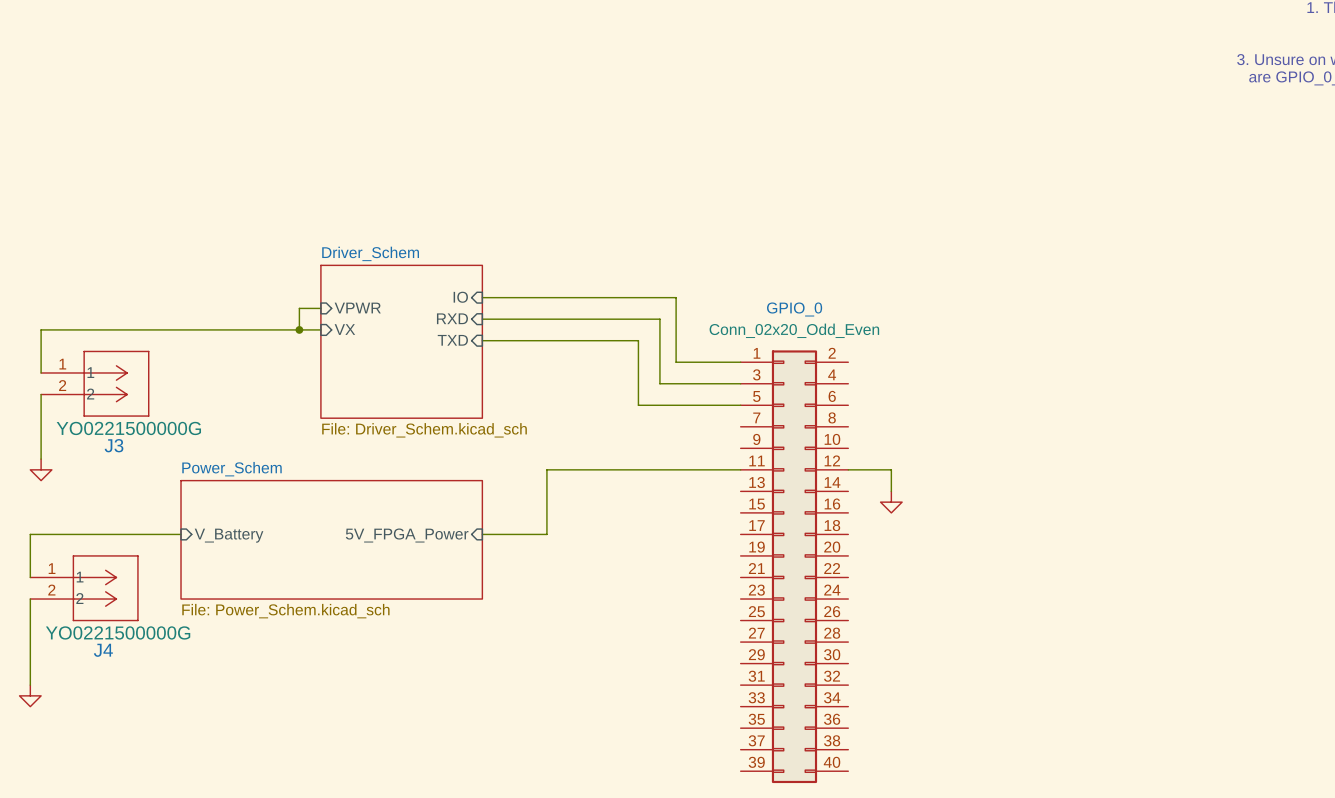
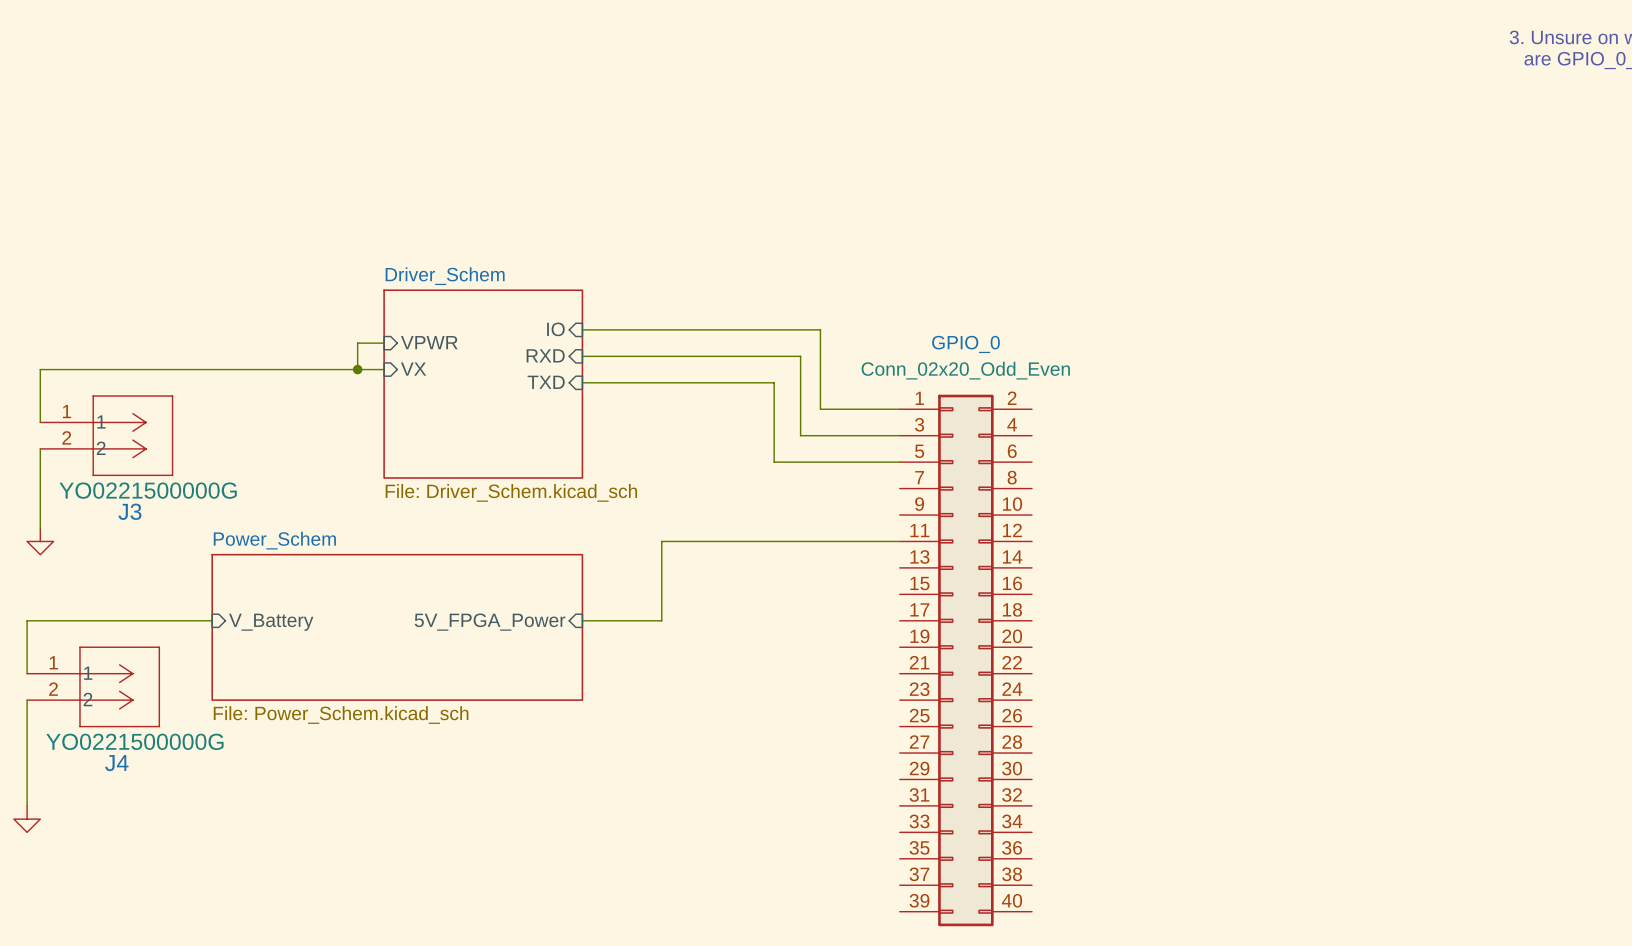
wire: (848, 469) (891, 469) (891, 491) -> none
power symbol: (891, 502) -> none

